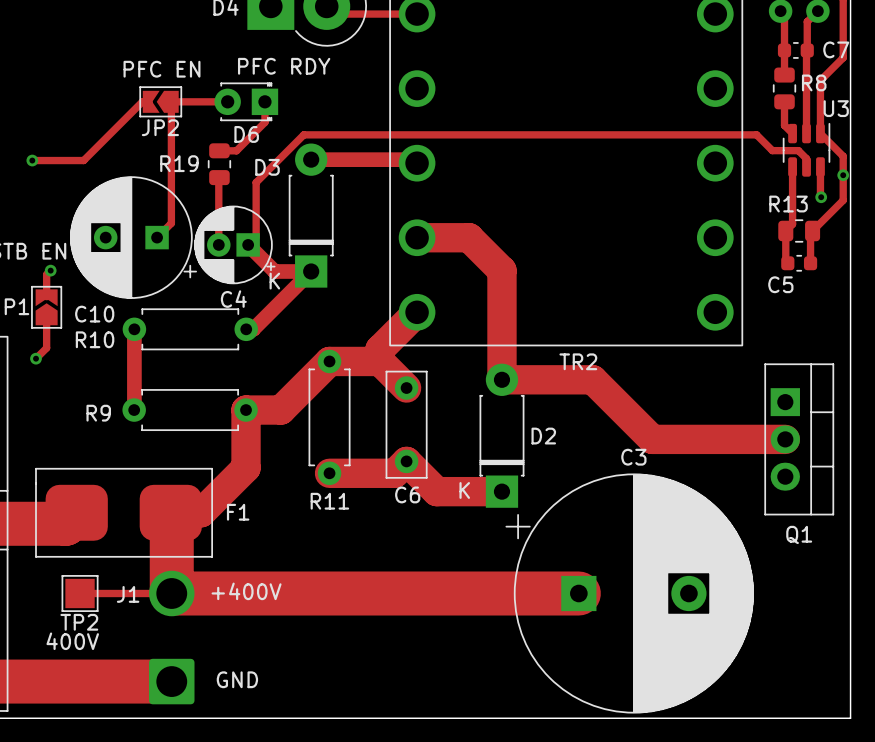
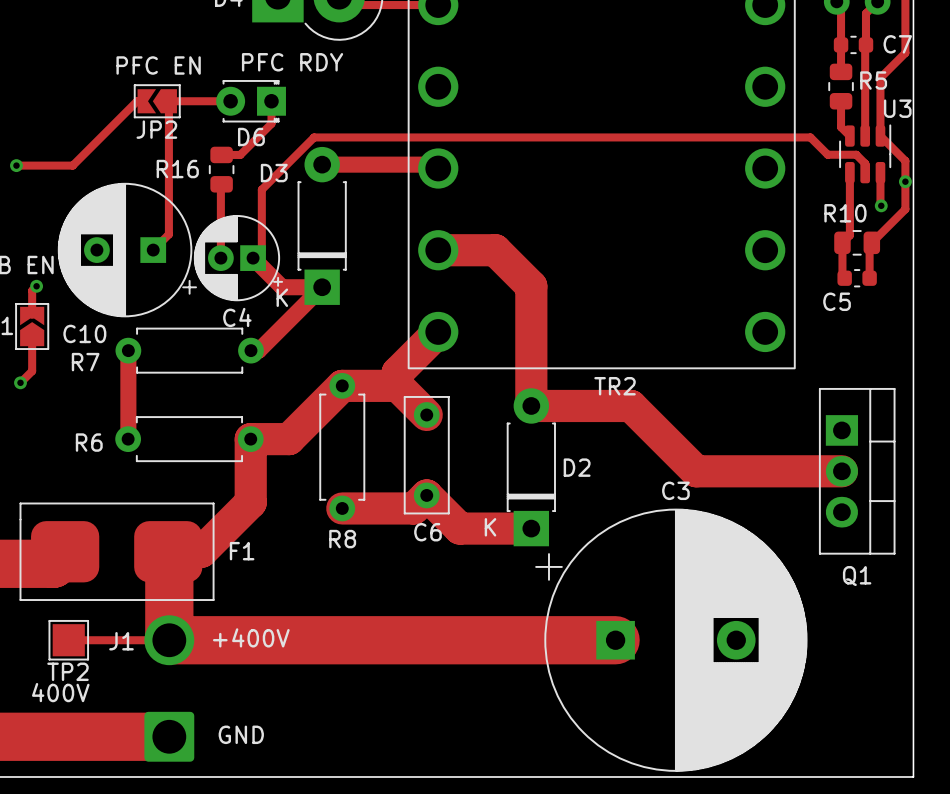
R8 name: R8 (814, 82) -> R5 (873, 80)
R19 name: R19 (179, 163) -> R16 (177, 169)
R13 name: R13 (788, 204) -> R10 (845, 213)
R10 name: R10 (95, 339) -> R7 (85, 362)
R9 name: R9 (98, 413) -> R6 (89, 442)
R11 name: R11 (329, 501) -> R8 (342, 539)

